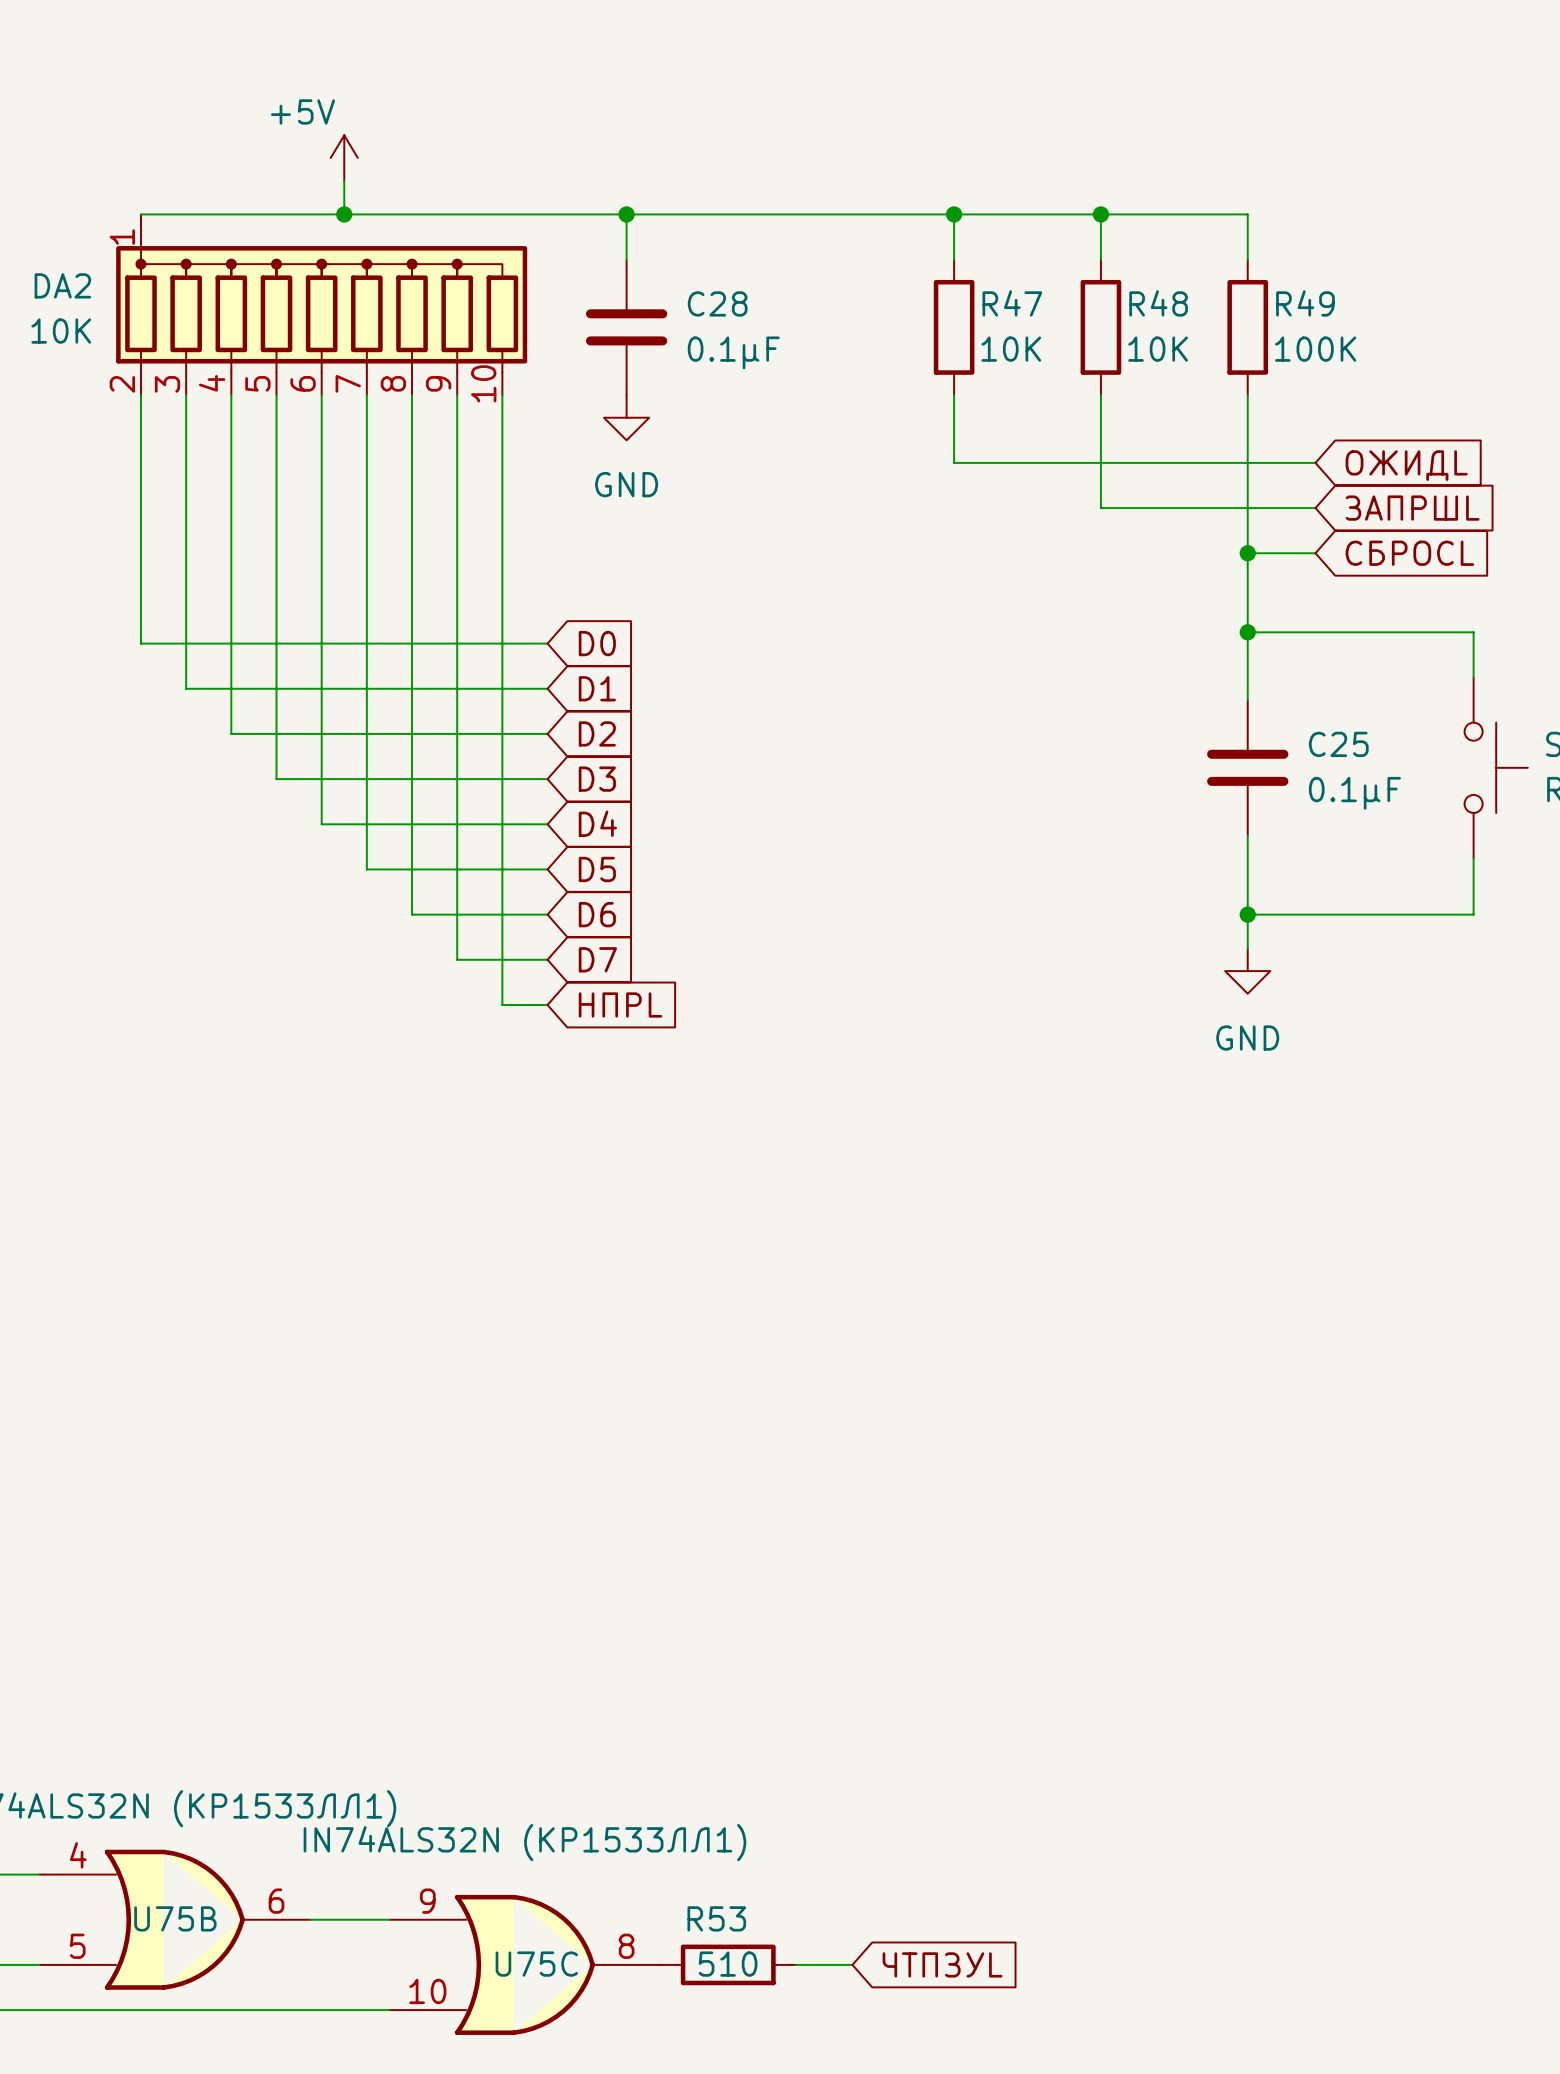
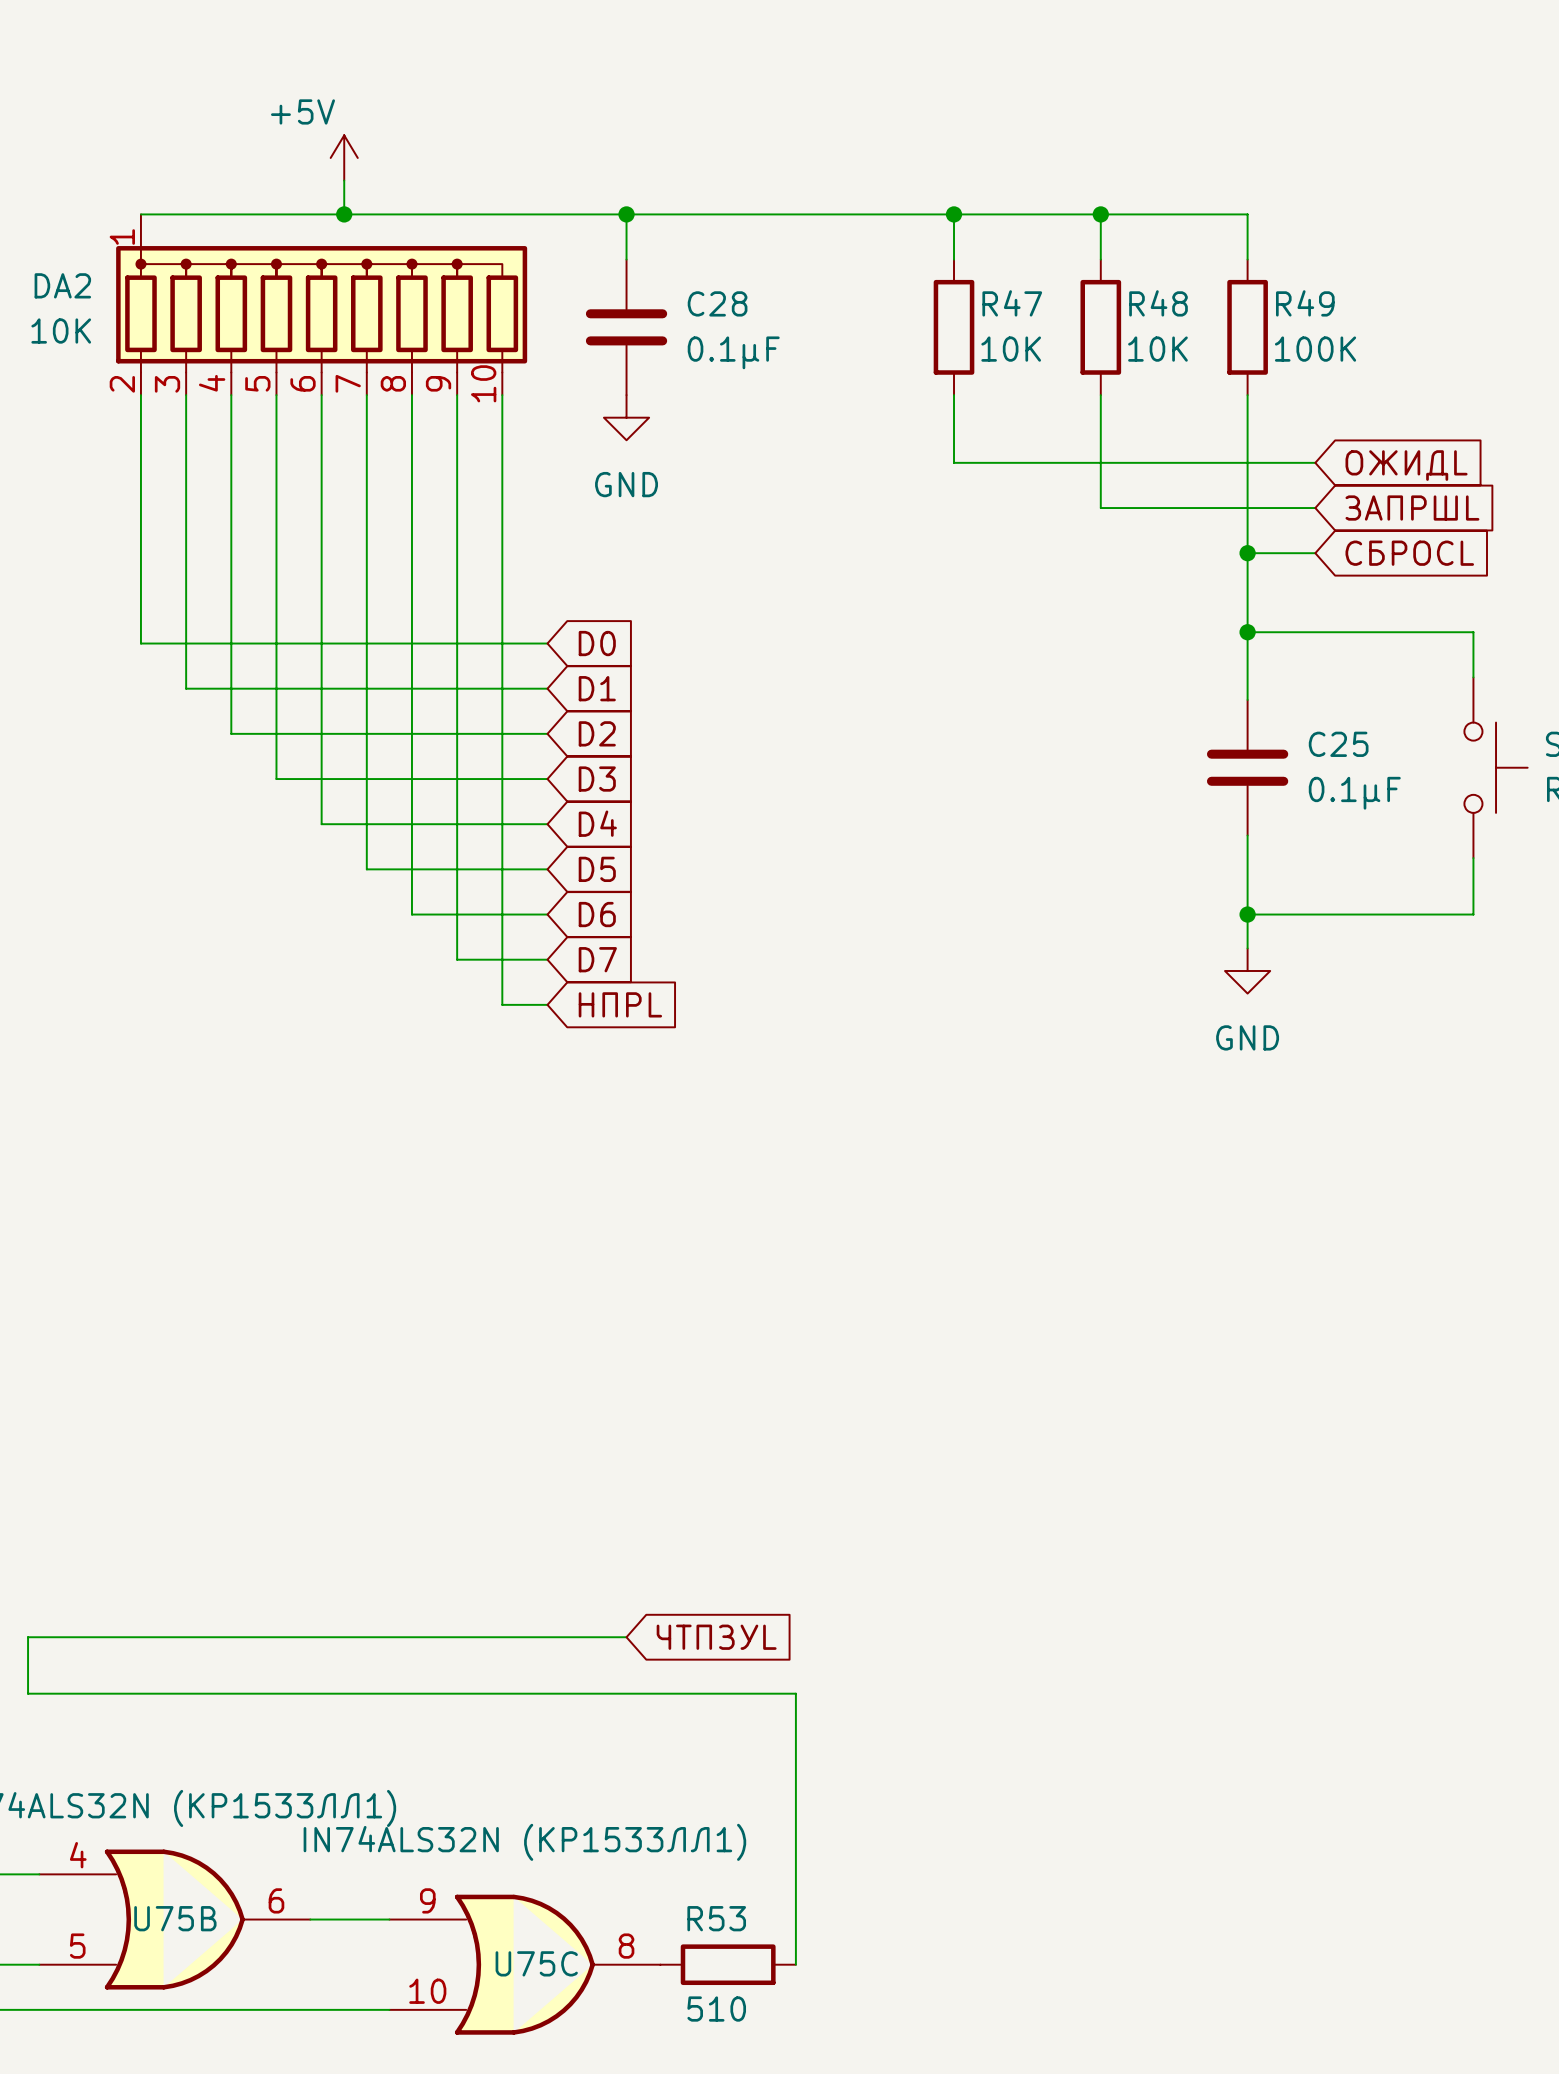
R53 value position: 510 (728, 1964) -> 510 (716, 2009)
wire: (796, 1964) (852, 1964) -> (795, 1964) (795, 1693) (28, 1693) (28, 1637) (626, 1637)
global label position: ЧТПЗУL (942, 1964) -> ЧТПЗУL (716, 1637)

